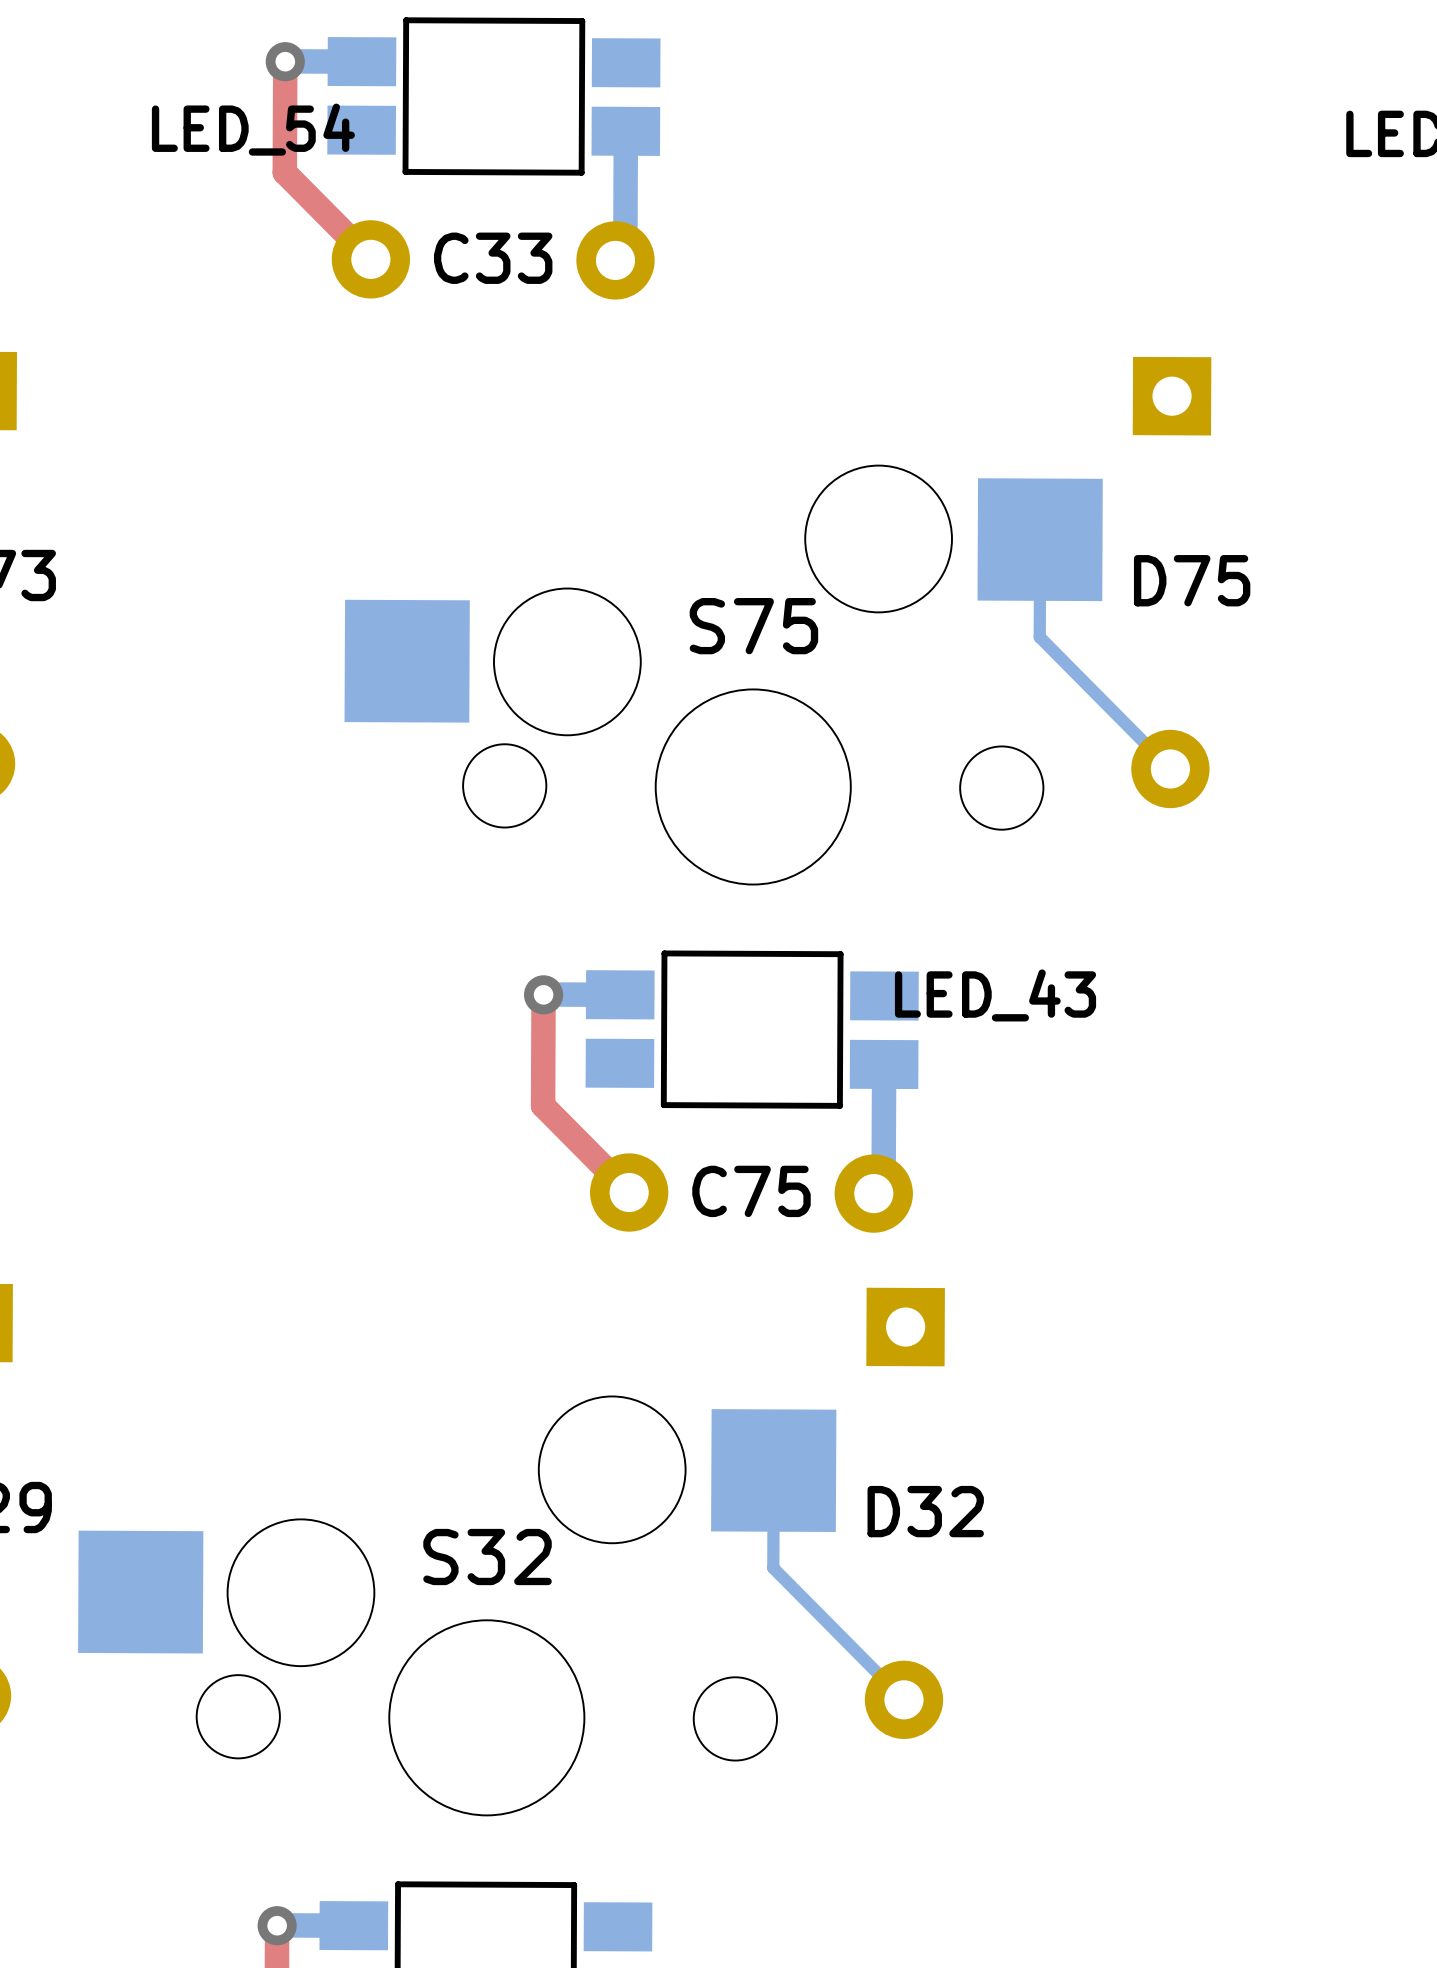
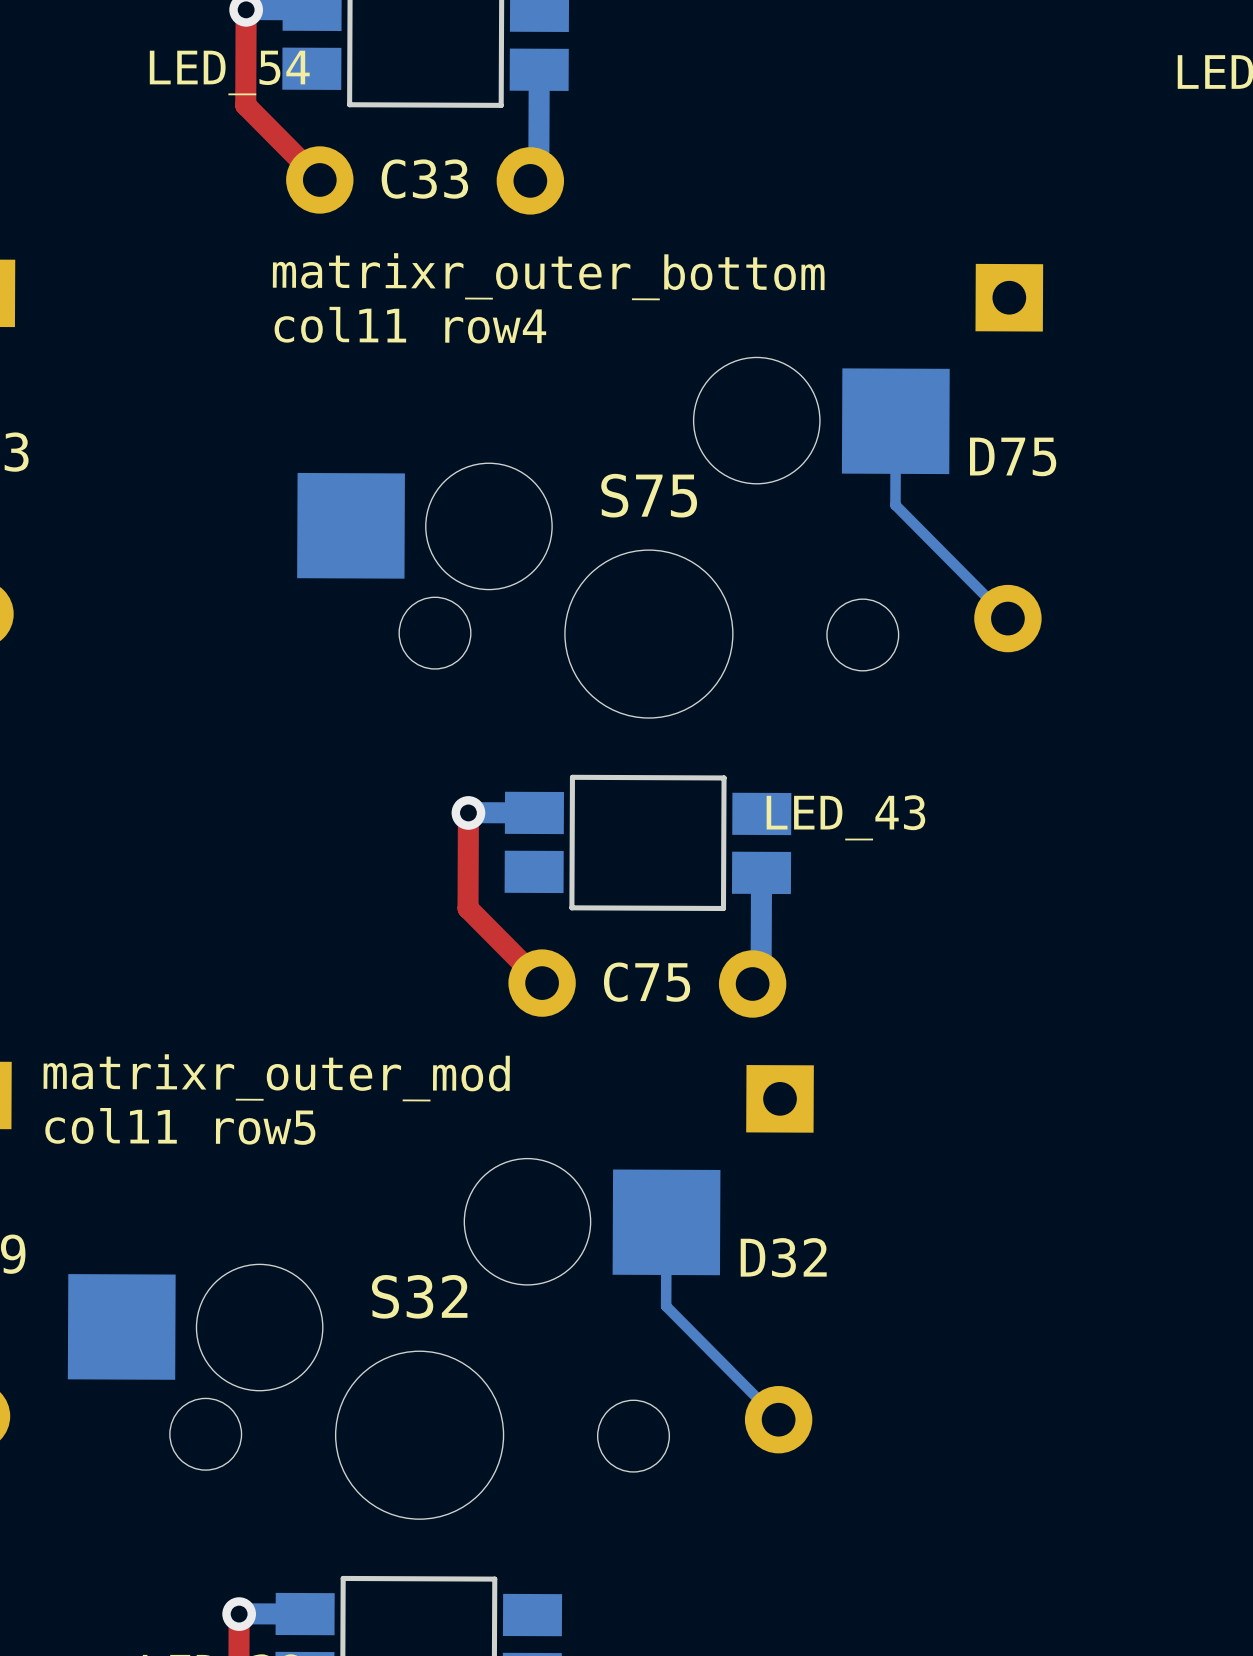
text: none -> matrixr_outer_bottom (548, 276)
text: none -> col11 row4 (410, 325)
text: none -> matrixr_outer_mod (276, 1077)
text: none -> col11 row5 (180, 1126)

